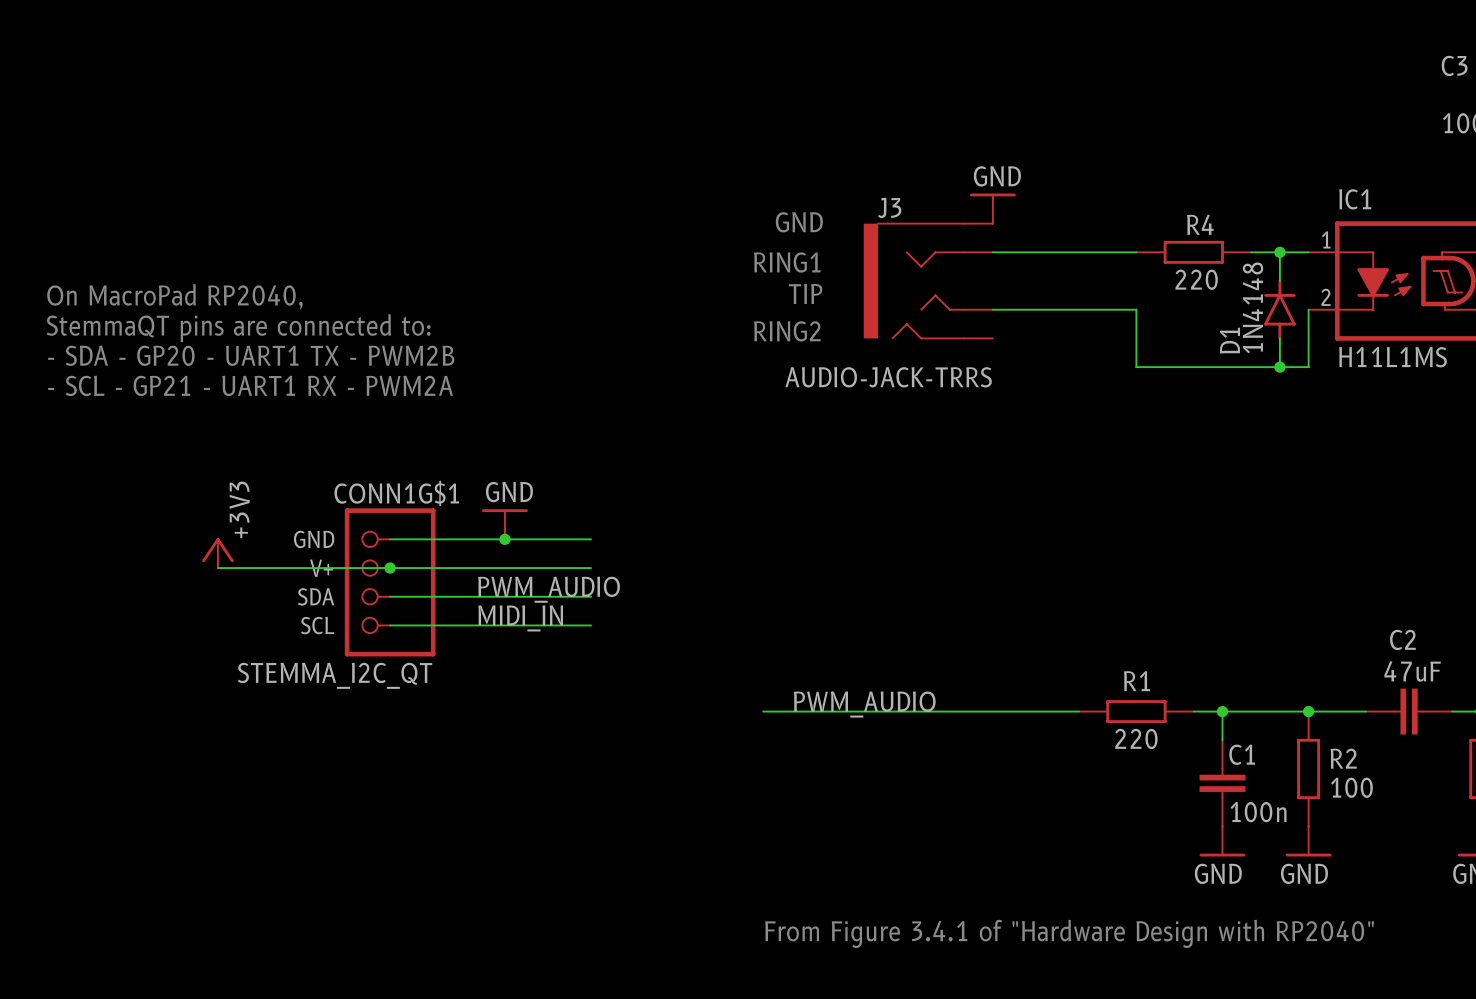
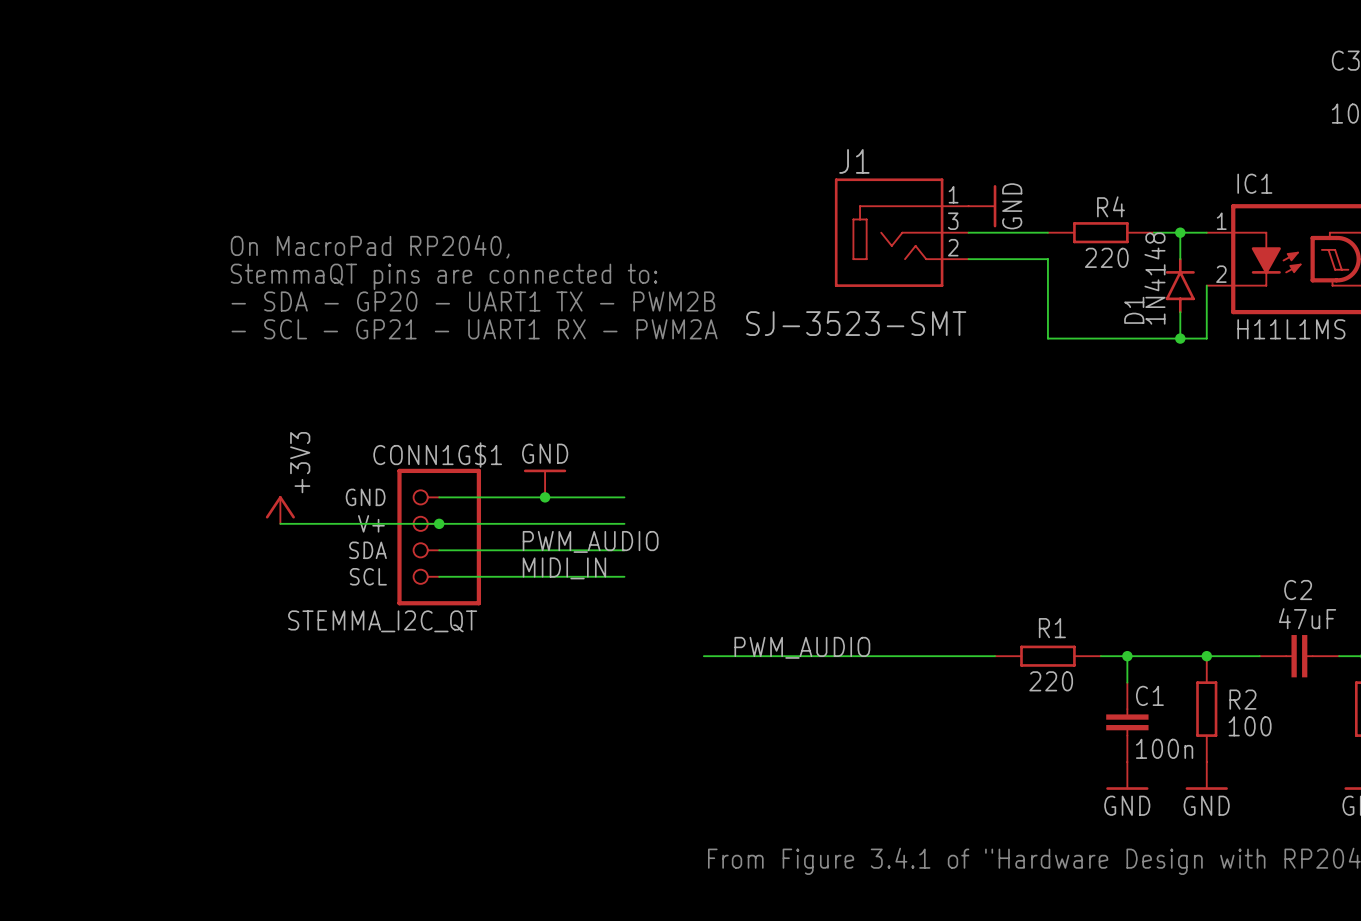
power symbol rotation: 0° (992, 194) -> 90° clockwise (995, 206)
power symbol position: GND (992, 208) -> GND (982, 206)
text: GND (799, 222) -> none
J1: none -> SJ-3523-SMT (901, 232)
text: RING1 (787, 262) -> none
J3: AUDIO-JACK-TRRS (928, 281) -> none
text: TIP (805, 293) -> none
text position: On MacroPad RP2040, (174, 296) -> On MacroPad RP2040, (370, 246)
wire: (992, 309) (1136, 309) -> (968, 259) (1047, 259) (1047, 285)
text position: StemmaQT pins are connected to: (238, 328) -> StemmaQT pins are connected to: (444, 276)
text: RING2 (787, 331) -> none
text position: - SDA - GP20 - UART1 TX - PWM2B (251, 355) -> - SDA - GP20 - UART1 TX - PWM2B (473, 301)
text position: - SCL - GP21 - UART1 RX - PWM2A (250, 385) -> - SCL - GP21 - UART1 RX - PWM2A (474, 329)
power symbol position: GND (504, 524) -> GND (545, 483)
wire: (390, 539) (476, 539) -> (545, 497) (624, 497)
junction position: (504, 539) -> (439, 523)
junction: none -> (545, 497)
power symbol position: +3V3 (217, 552) -> +3V3 (280, 509)
wire: (217, 568) (304, 568) -> none
junction: (390, 568) -> none
wire: none -> (545, 523) (624, 523)
CONN1G$1 position: (390, 582) -> (439, 537)
label position: PWM_AUDIO (549, 589) -> PWM_AUDIO (590, 541)
wire: (390, 596) (476, 596) -> (545, 550) (624, 550)
label position: MIDI_IN (520, 618) -> MIDI_IN (564, 568)
wire: (390, 625) (476, 625) -> (545, 576) (624, 576)

